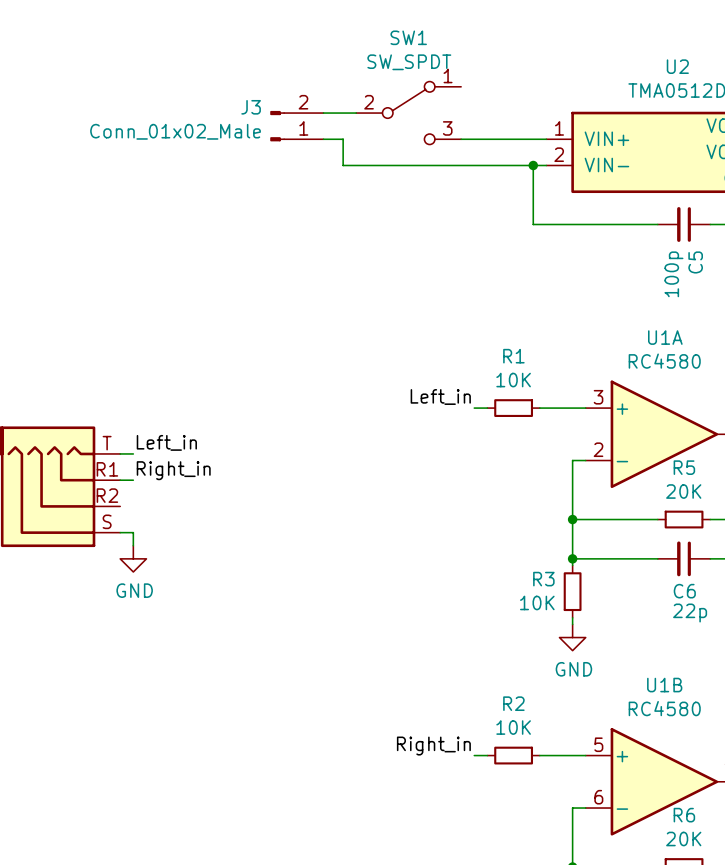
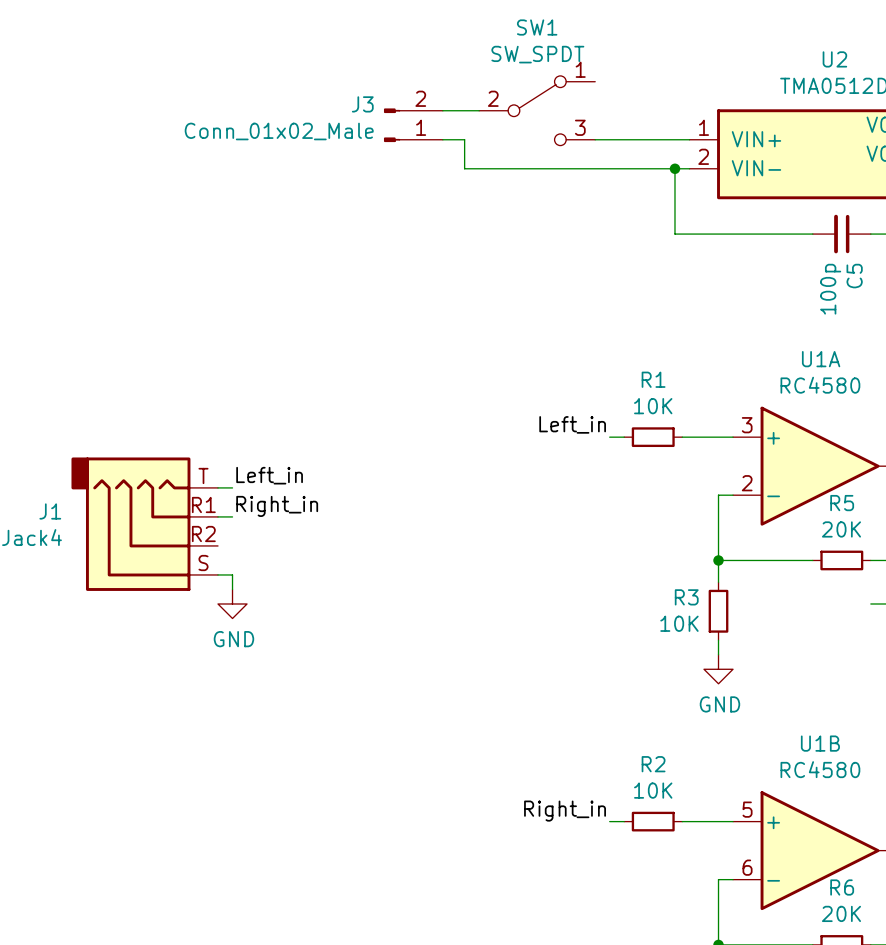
wire: (572, 539) (572, 565) -> none
wire: (572, 558) (657, 558) -> none
junction: (572, 558) -> none
C6: 22p (684, 558) -> none
wire: none -> (718, 640) (718, 654)
R3 position: (572, 591) -> (718, 611)
wire: (572, 617) (572, 624) -> none
power symbol position: GND (572, 637) -> GND (718, 669)

